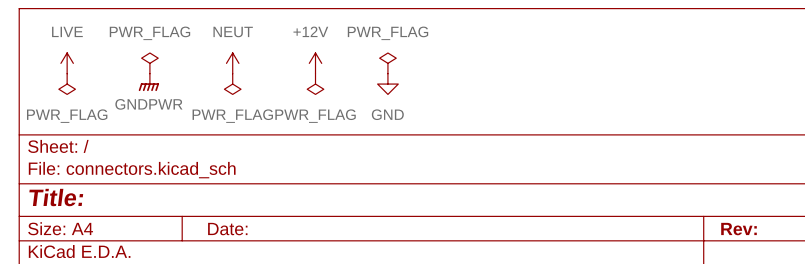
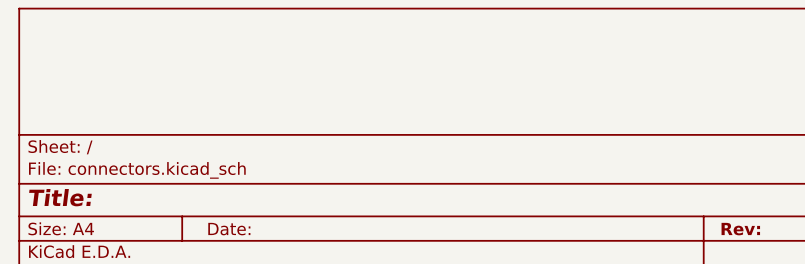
power symbol: LIVE (67, 63) -> none
power symbol: PWR_FLAG (149, 63) -> none
power symbol: NEUT (232, 63) -> none
power symbol: +12V (315, 63) -> none
power symbol: PWR_FLAG (387, 63) -> none
power symbol: GNDPWR (148, 82) -> none
power symbol: PWR_FLAG (67, 84) -> none
power symbol: PWR_FLAG (232, 84) -> none
power symbol: PWR_FLAG (315, 84) -> none
power symbol: GND (387, 84) -> none

